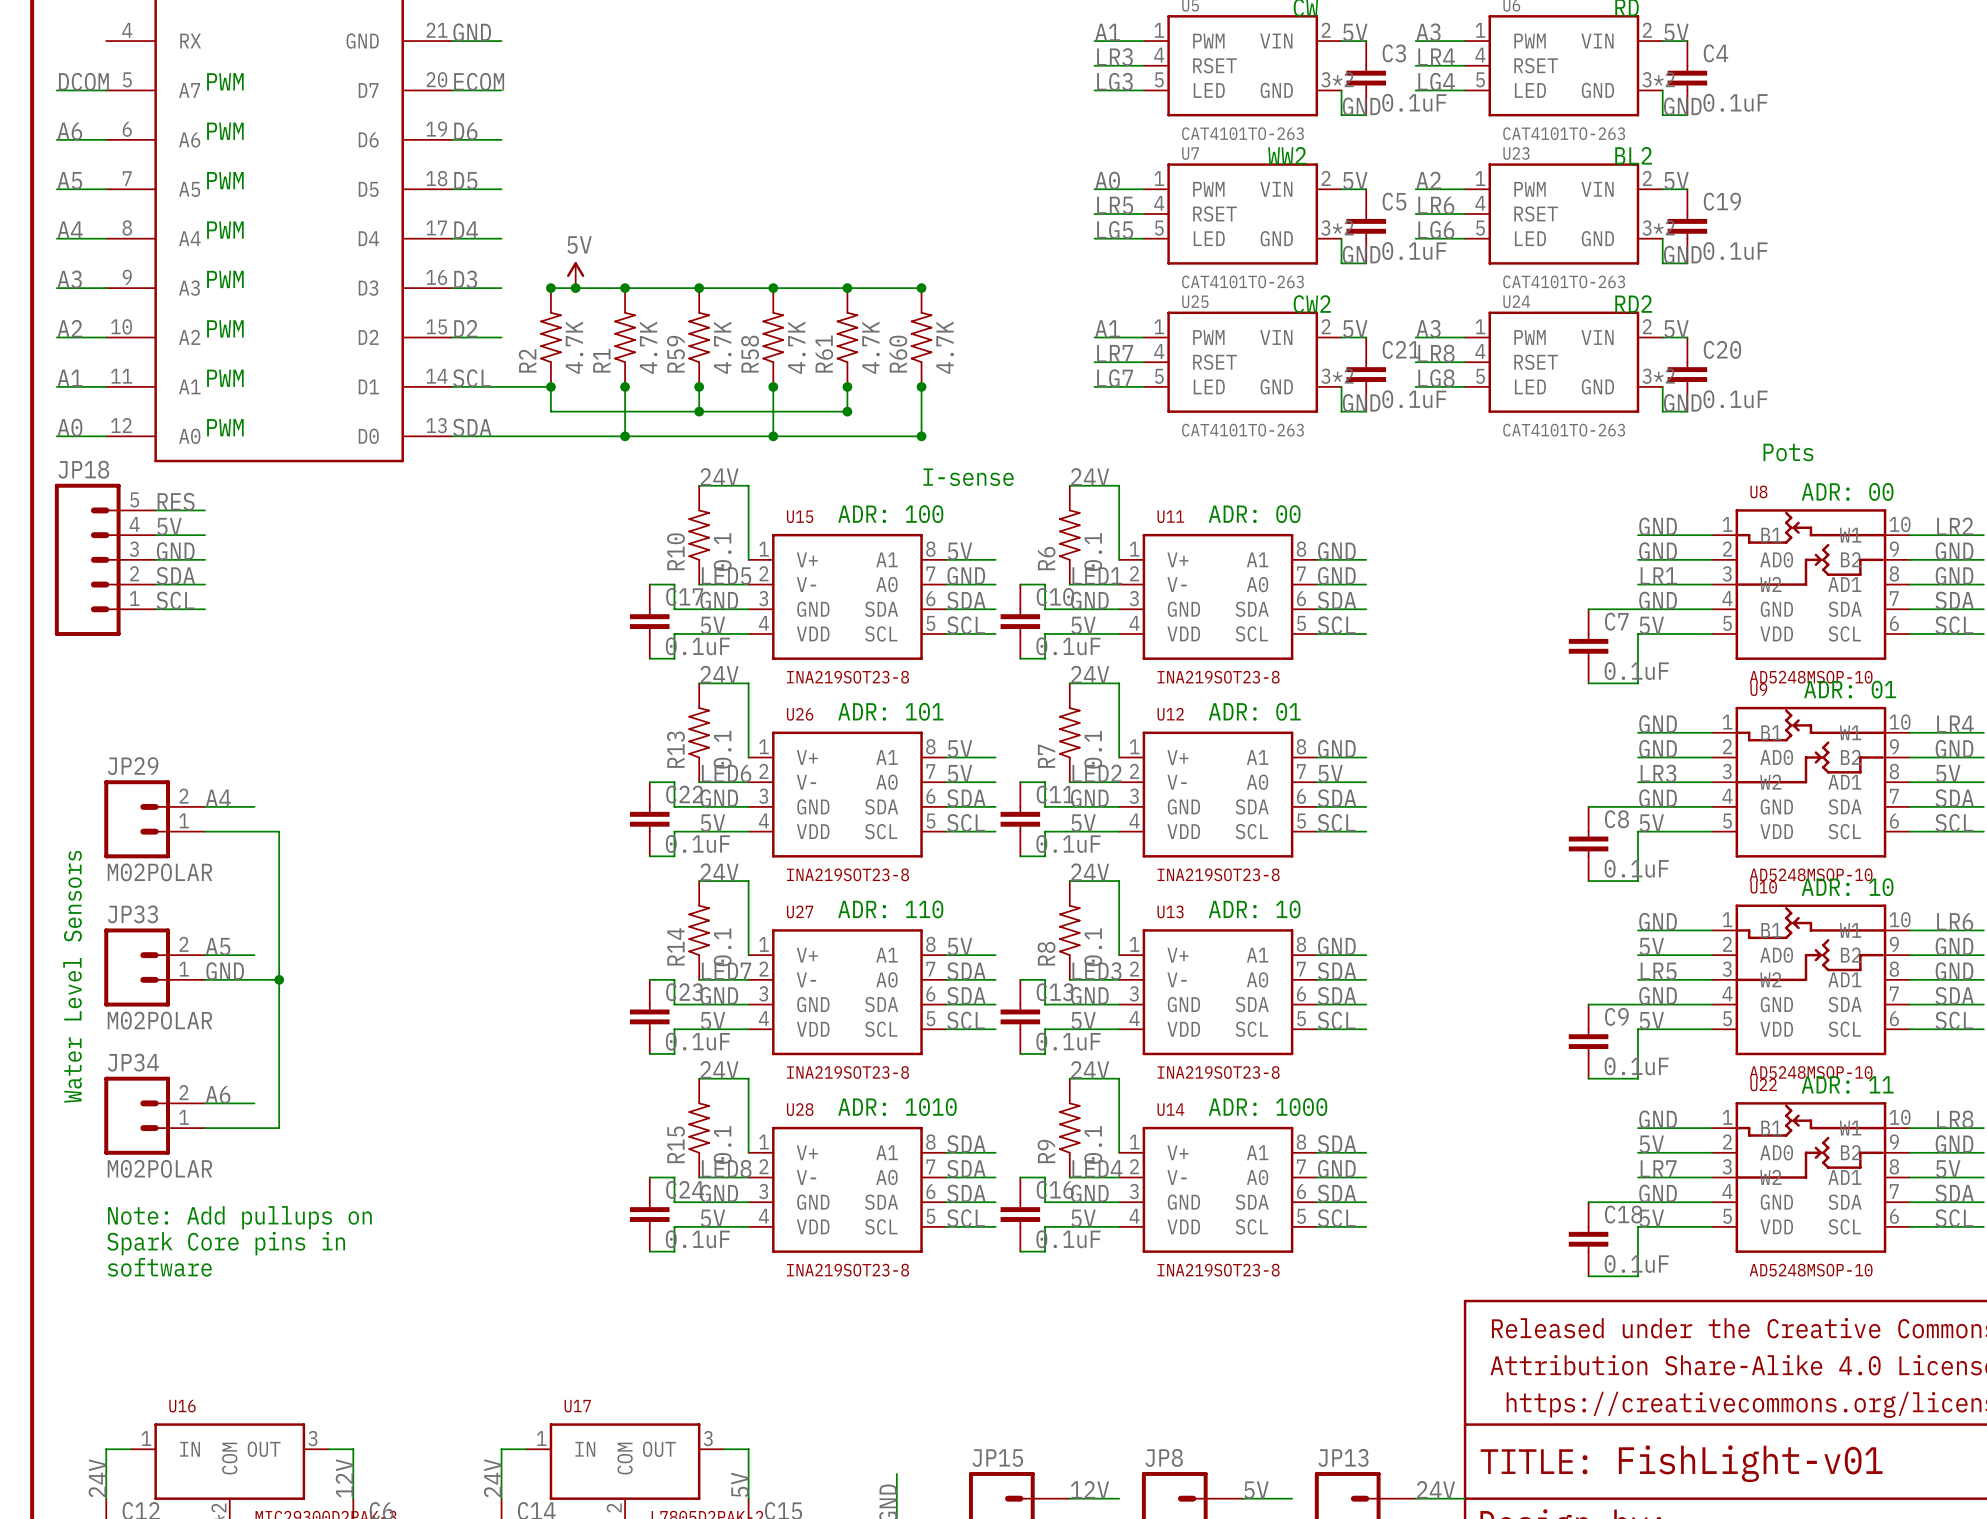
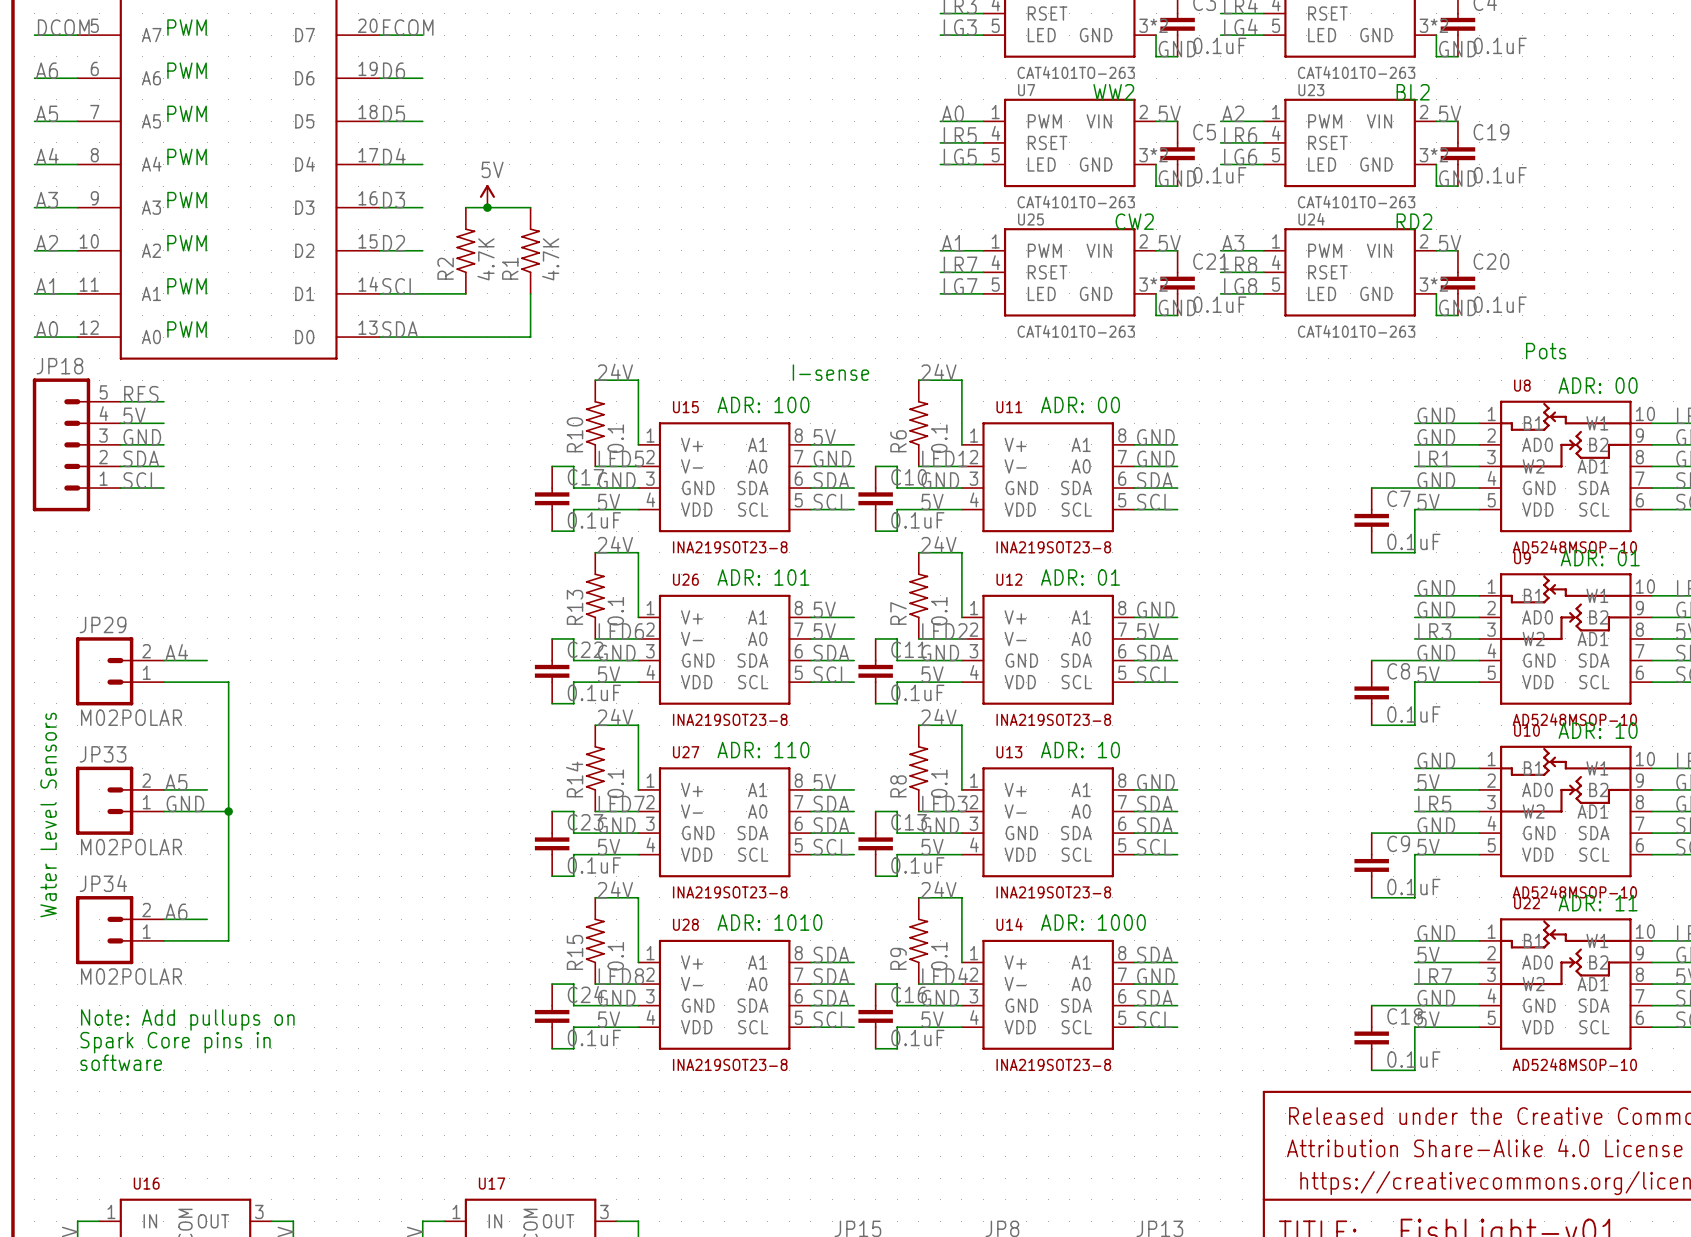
junction: (550, 288) -> none
wire: (625, 288) (921, 288) -> none
junction: (625, 288) -> none
junction: (699, 288) -> none
junction: (773, 288) -> none
junction: (847, 288) -> none
junction: (921, 288) -> none
R59: 4.7K (699, 337) -> none
R58: 4.7K (773, 337) -> none
R61: 4.7K (847, 337) -> none
R60: 4.7K (921, 337) -> none
wire: (550, 386) (550, 411) (847, 411) (847, 386) -> none
junction: (550, 386) -> none
junction: (625, 386) -> none
wire: (699, 386) (699, 411) -> none
junction: (699, 386) -> none
wire: (773, 386) (773, 436) -> none
junction: (773, 386) -> none
junction: (847, 386) -> none
wire: (921, 386) (921, 436) (625, 436) -> none
junction: (921, 386) -> none
junction: (699, 411) -> none
junction: (847, 411) -> none
junction: (625, 436) -> none
junction: (773, 436) -> none
junction: (921, 436) -> none

